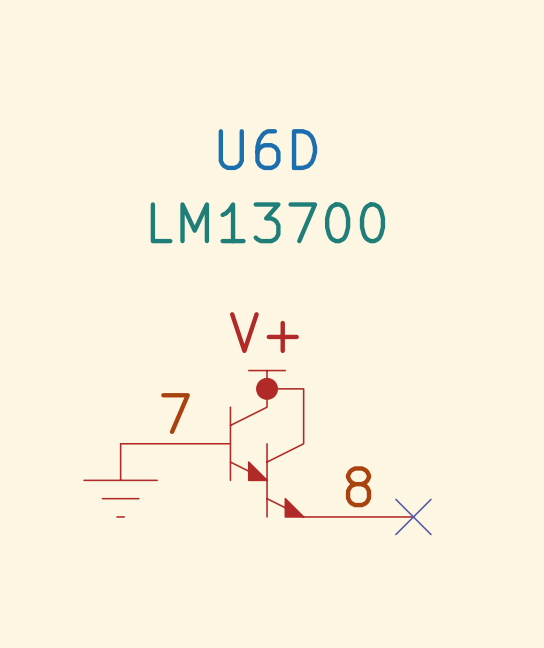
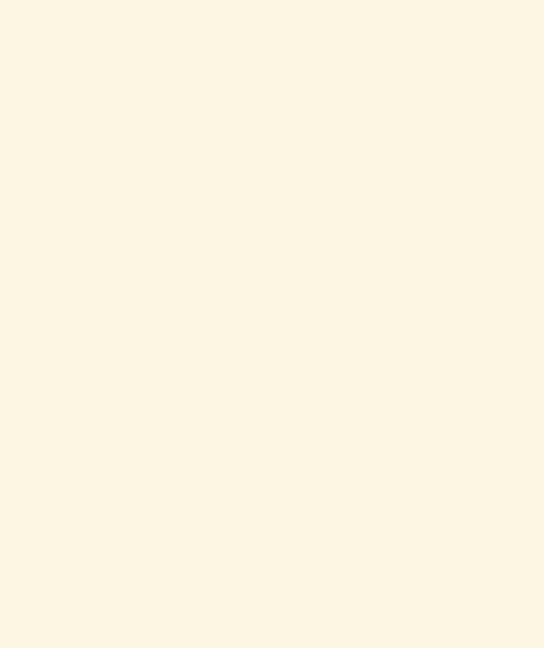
U6D: LM13700 (267, 443) -> none
power symbol: (120, 480) -> none
no-connect mark: (413, 516) -> none

